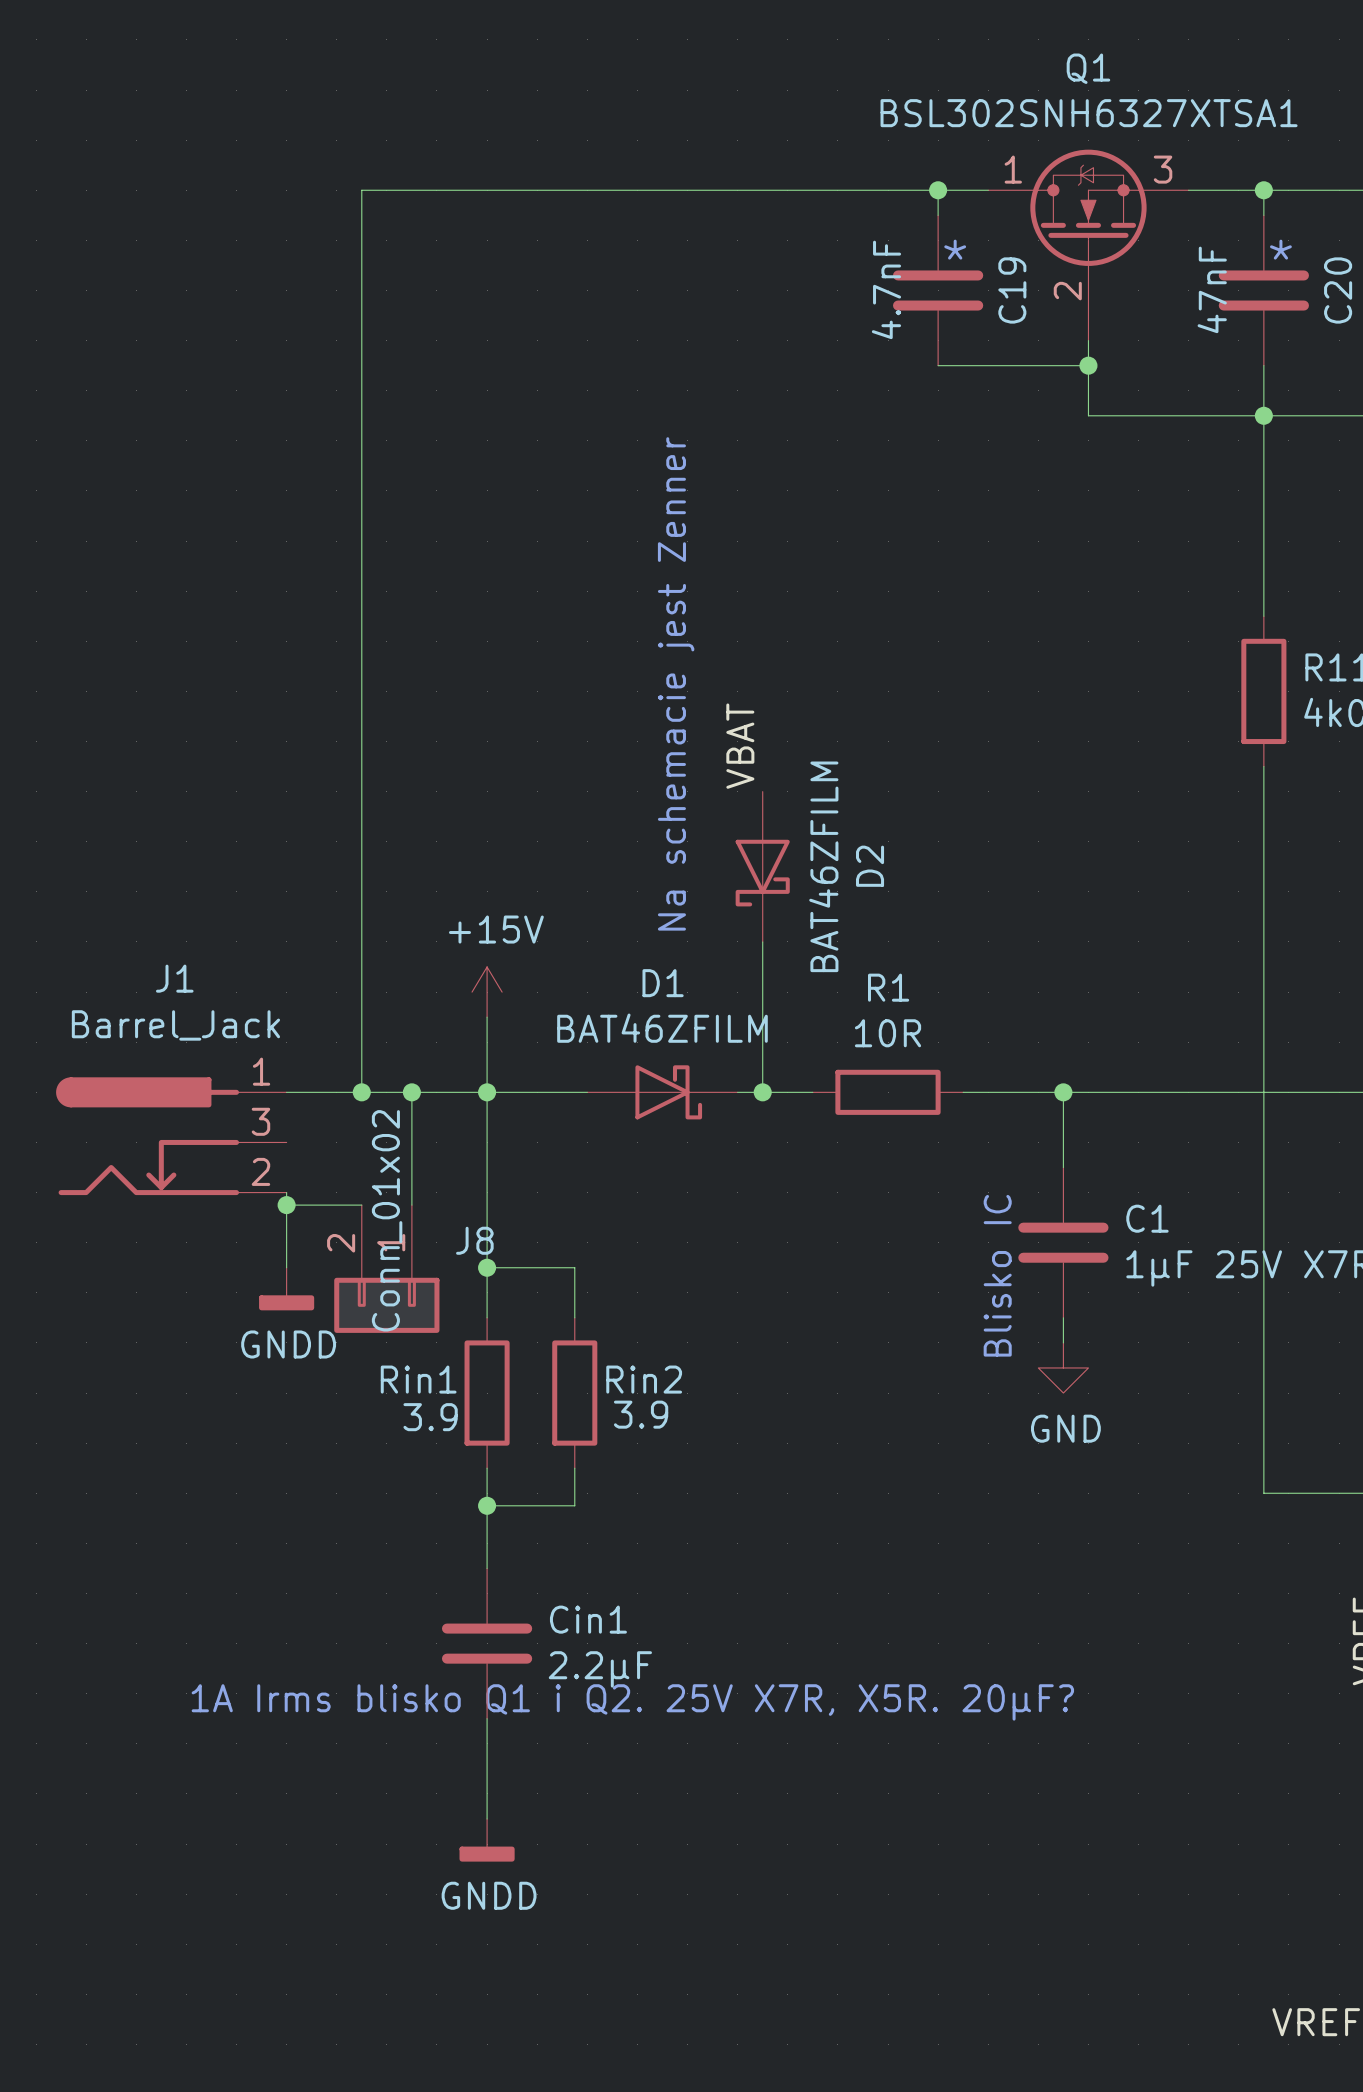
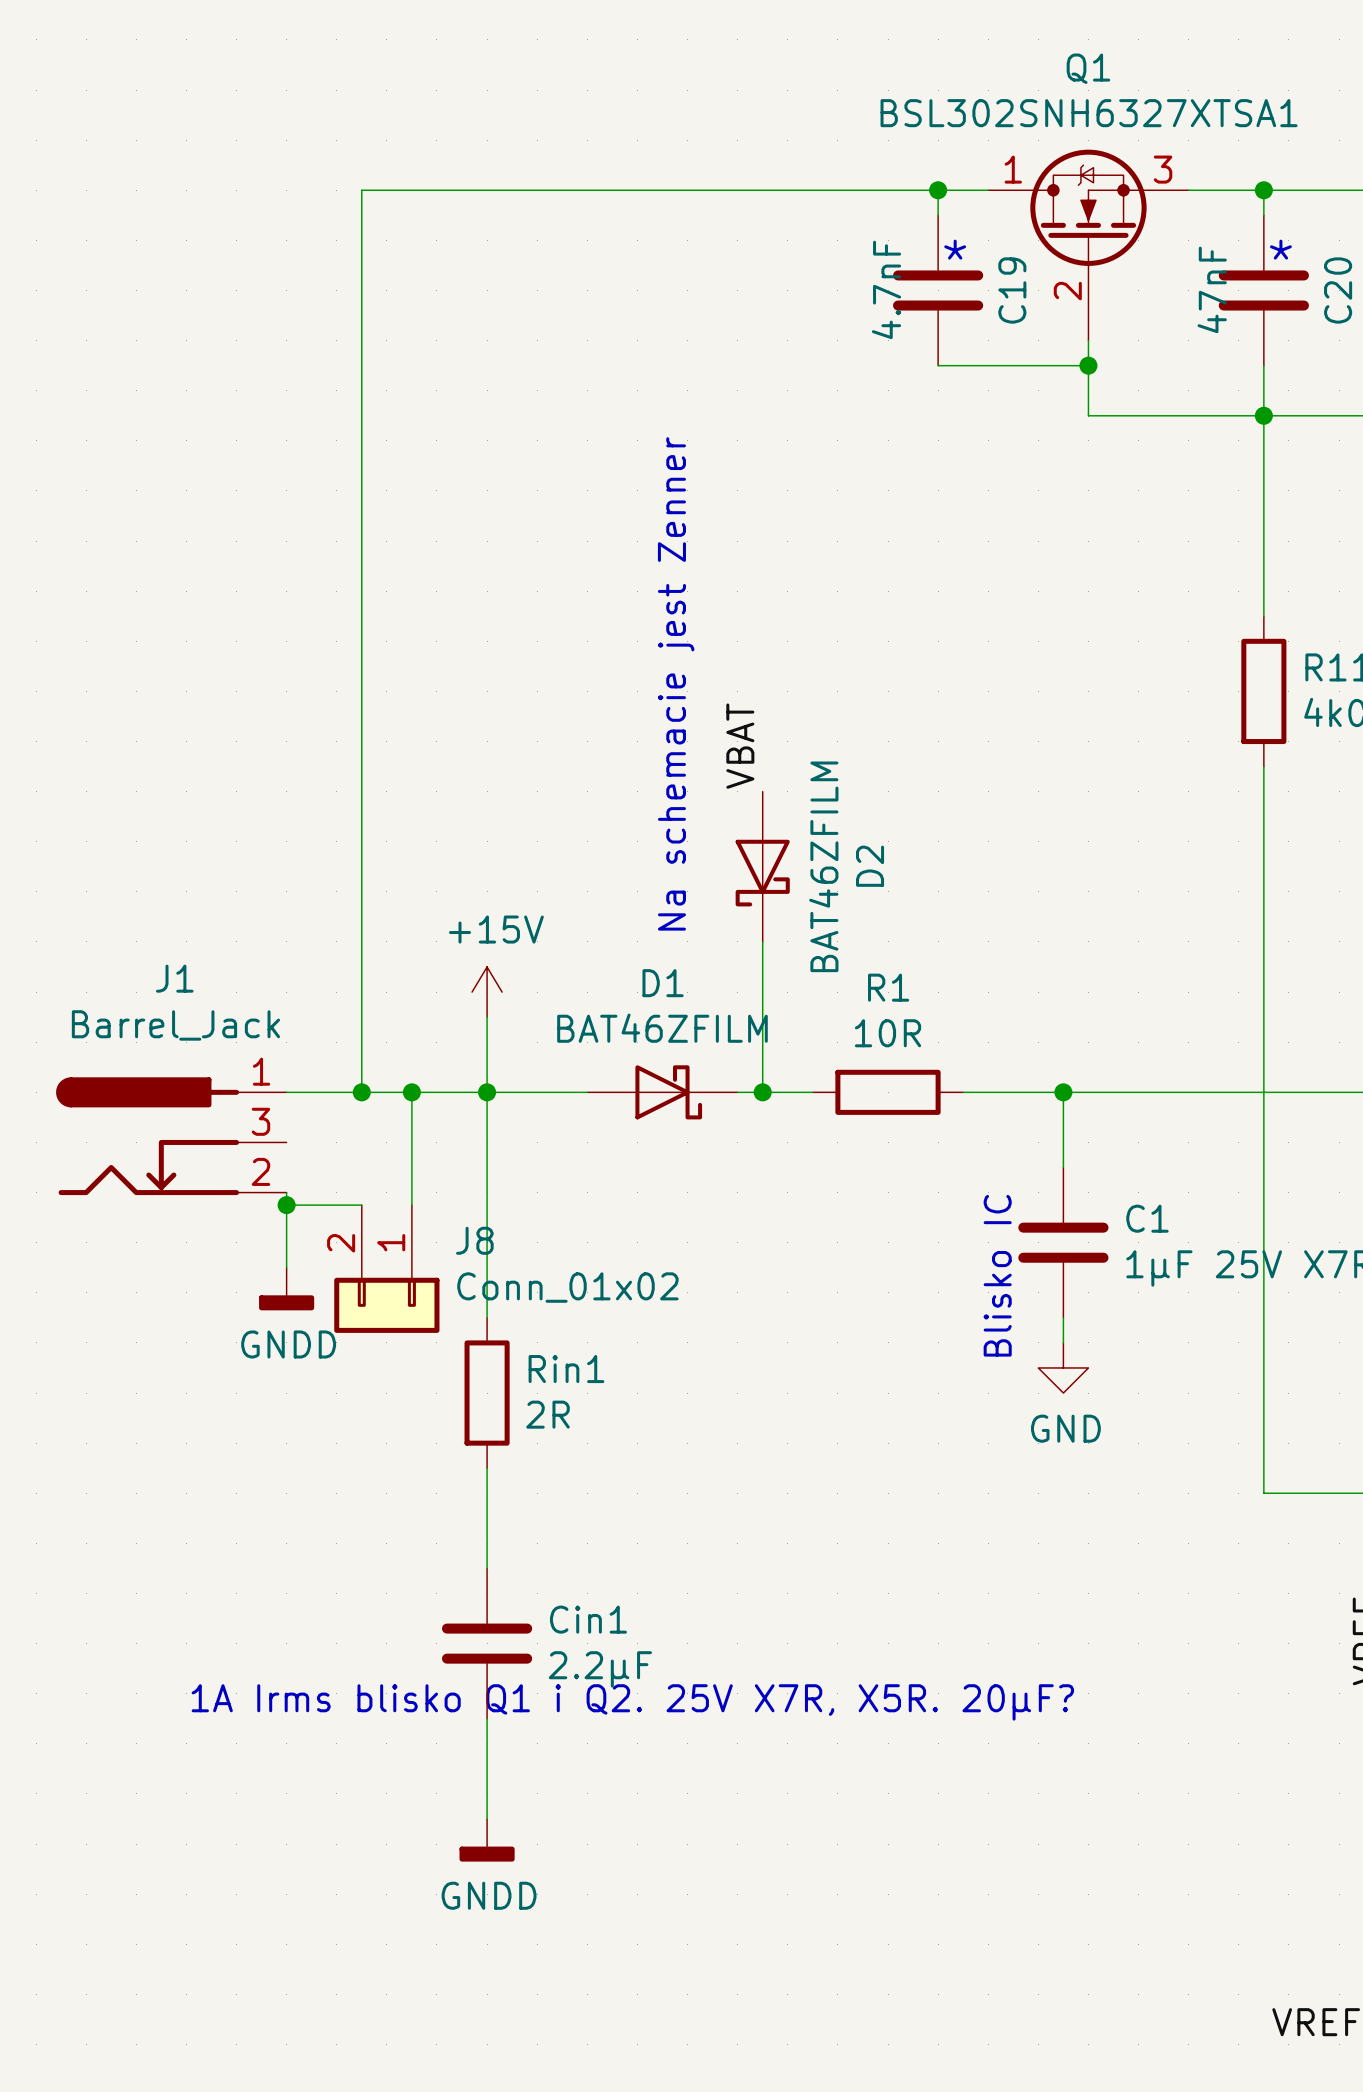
J8 value rotation: 0° (387, 1220) -> 90° clockwise (567, 1287)
wire: (487, 1267) (574, 1267) (574, 1317) -> none
junction: (487, 1267) -> none
Rin1 name position: Rin1 (418, 1379) -> Rin1 (566, 1369)
Rin2: 3.9 (574, 1393) -> none
Rin1 value: 3.9 (430, 1417) -> 2R (548, 1414)
wire: (574, 1468) (574, 1505) (487, 1505) -> none
junction: (487, 1505) -> none

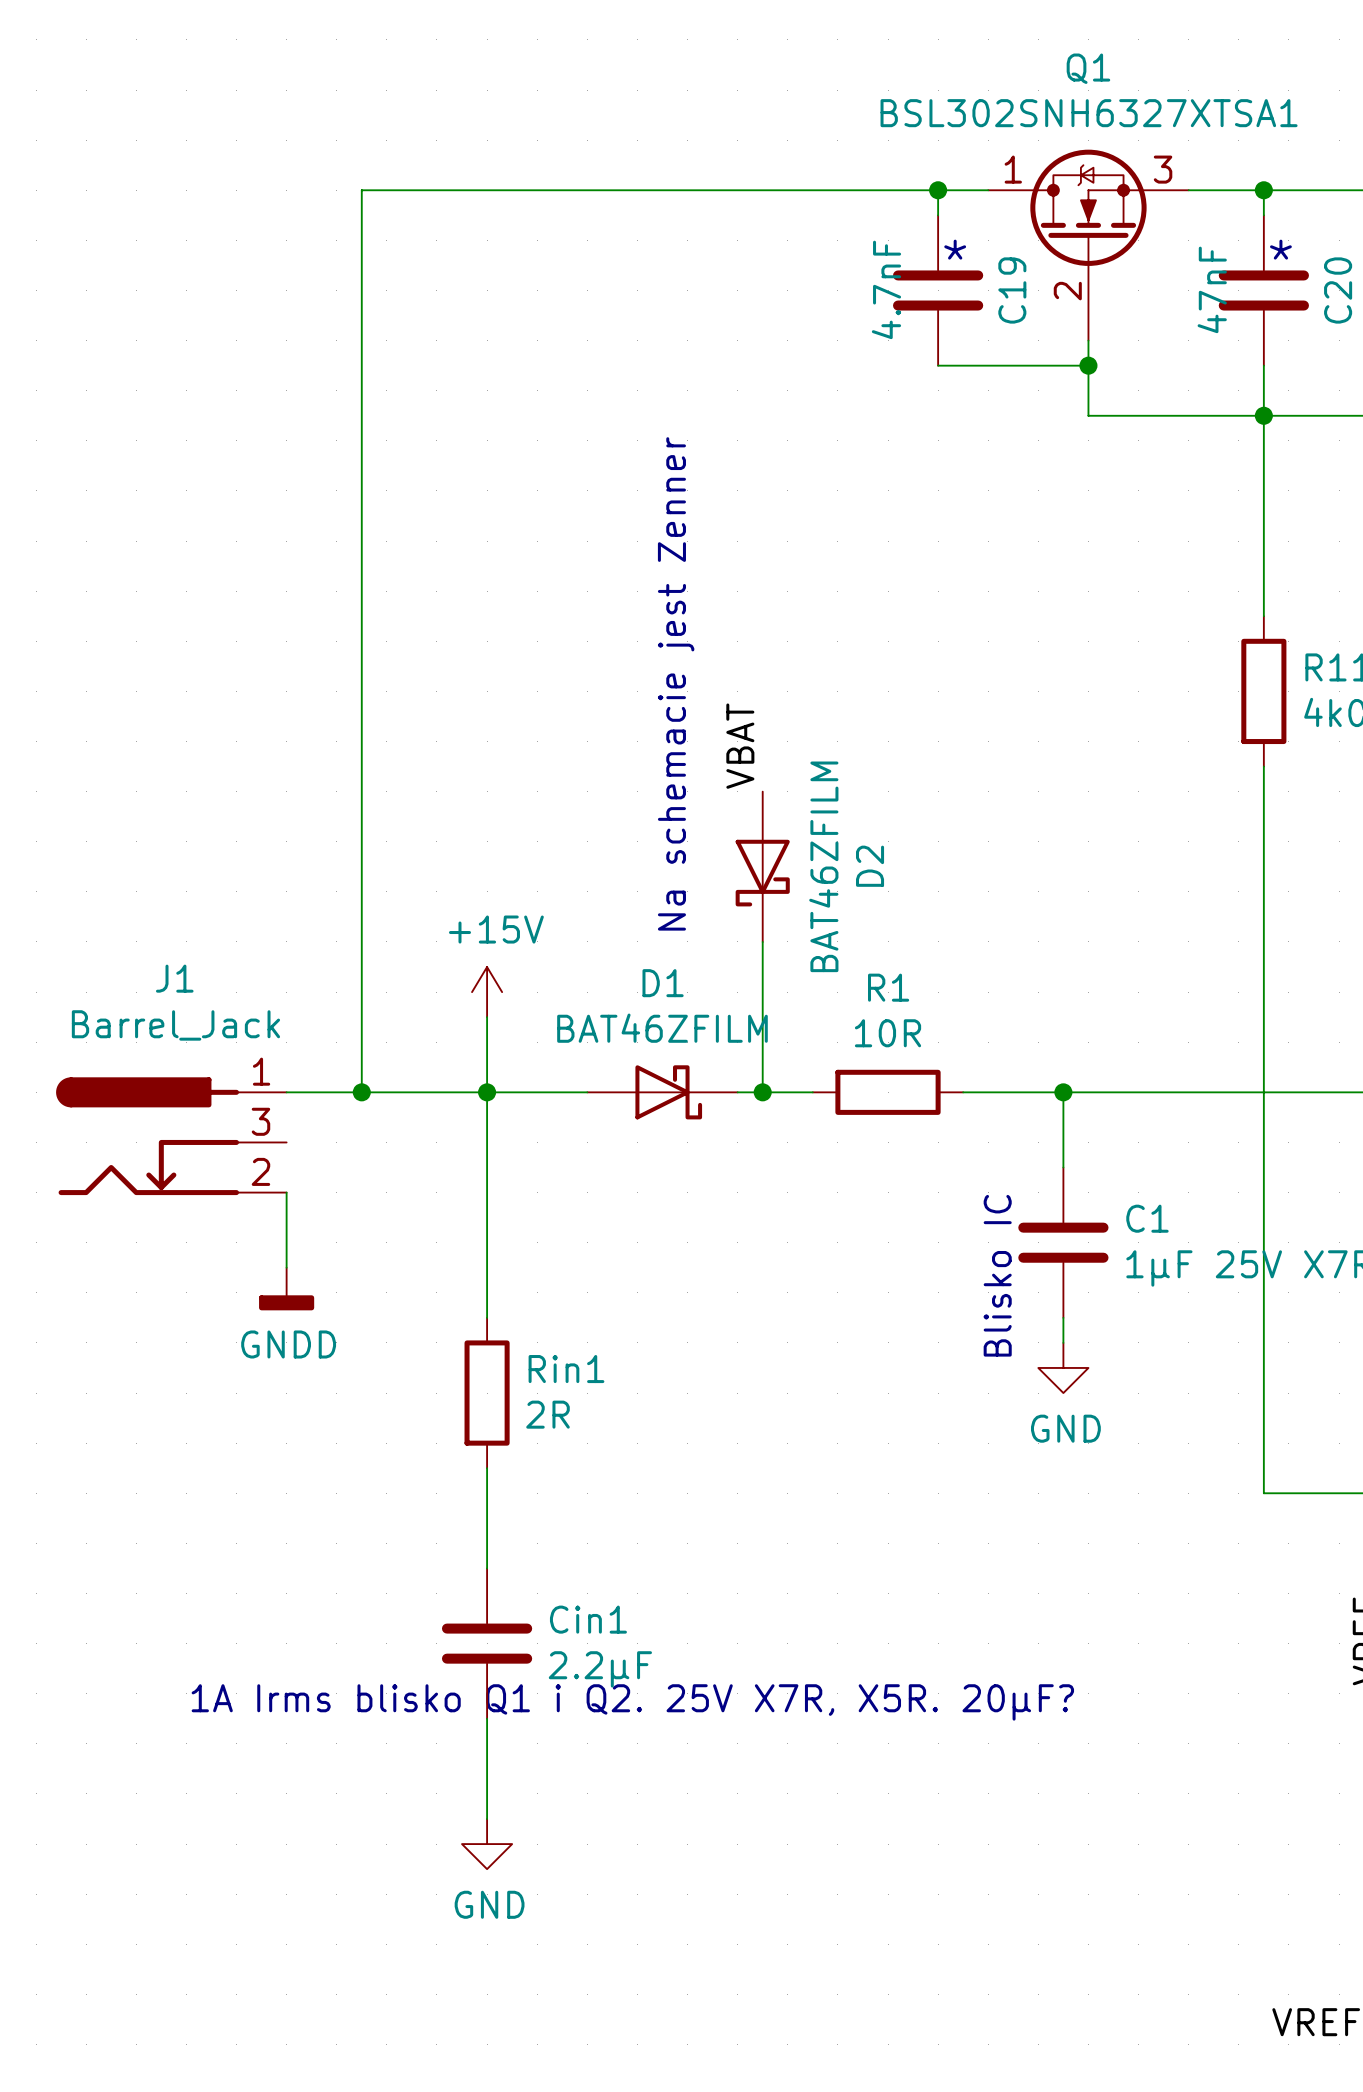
wire: (411, 1092) (411, 1205) -> none
junction: (411, 1092) -> none
wire: (286, 1205) (361, 1205) -> none
junction: (286, 1205) -> none
J8: Conn_01x02 (386, 1269) -> none
power symbol: GNDD (487, 1840) -> GND (487, 1844)

